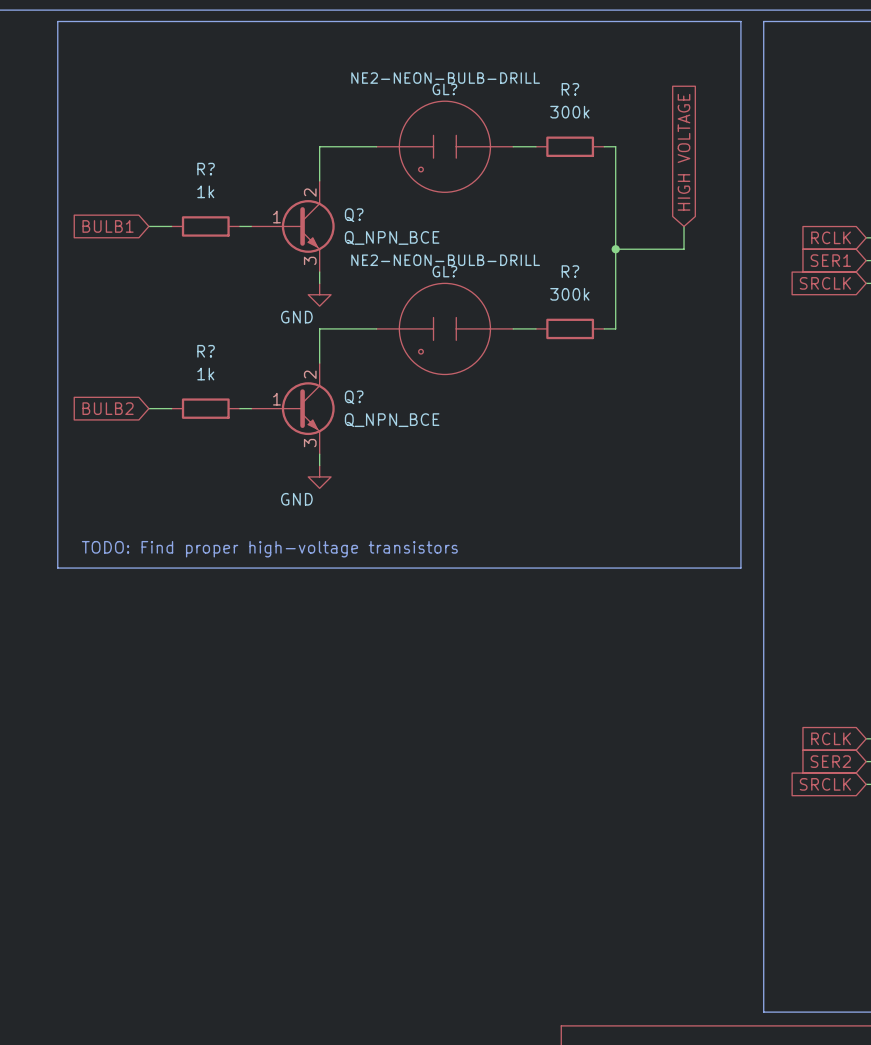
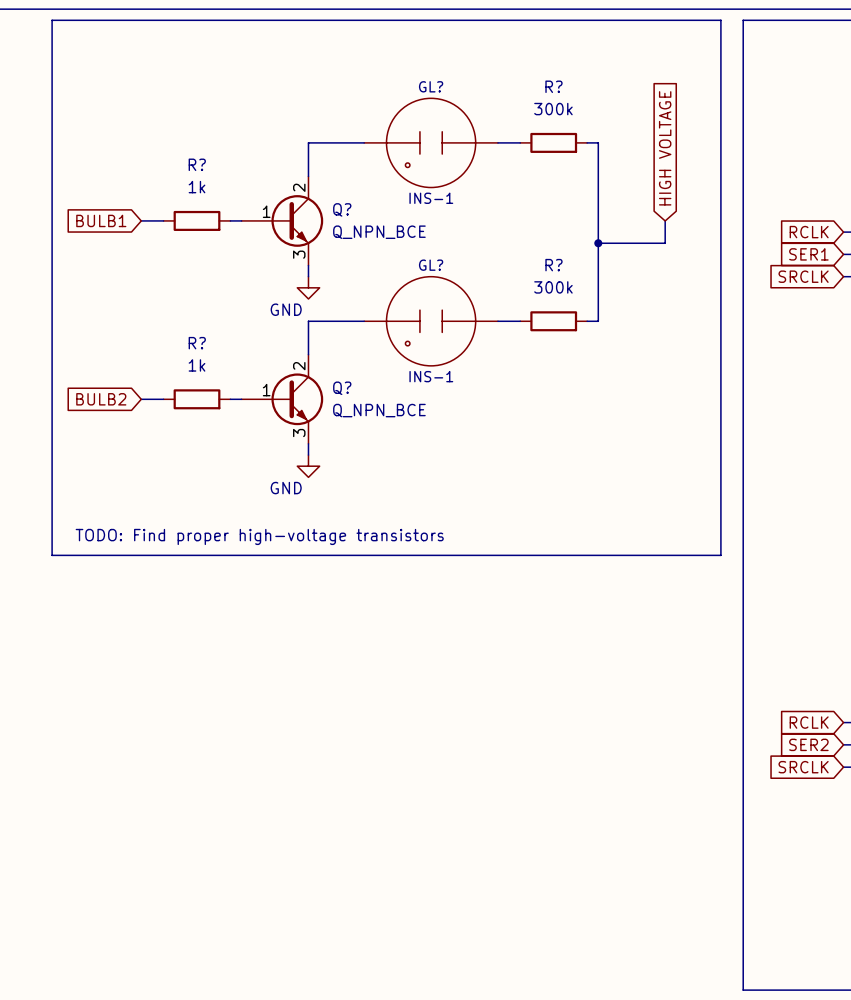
GL? value: NE2-NEON-BULB-DRILL (445, 78) -> INS-1 (431, 198)
GL? value: NE2-NEON-BULB-DRILL (445, 260) -> INS-1 (431, 376)

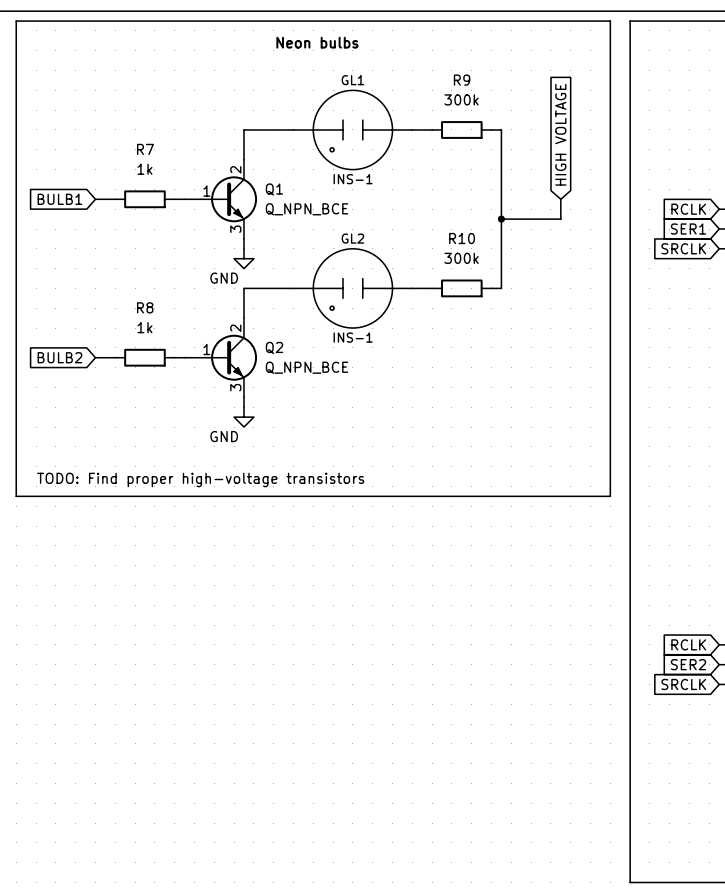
text: none -> Neon bulbs (317, 42)
GL? name: GL? (431, 86) -> GL1 (352, 80)
R? name: R? (553, 86) -> R9 (462, 80)
R? name: R? (197, 164) -> R7 (145, 149)
Q? name: Q? (342, 209) -> Q1 (274, 189)
GL? name: GL? (431, 265) -> GL2 (352, 238)
R? name: R? (553, 265) -> R10 (462, 238)
R? name: R? (197, 343) -> R8 (145, 307)
Q? name: Q? (342, 388) -> Q2 (274, 347)

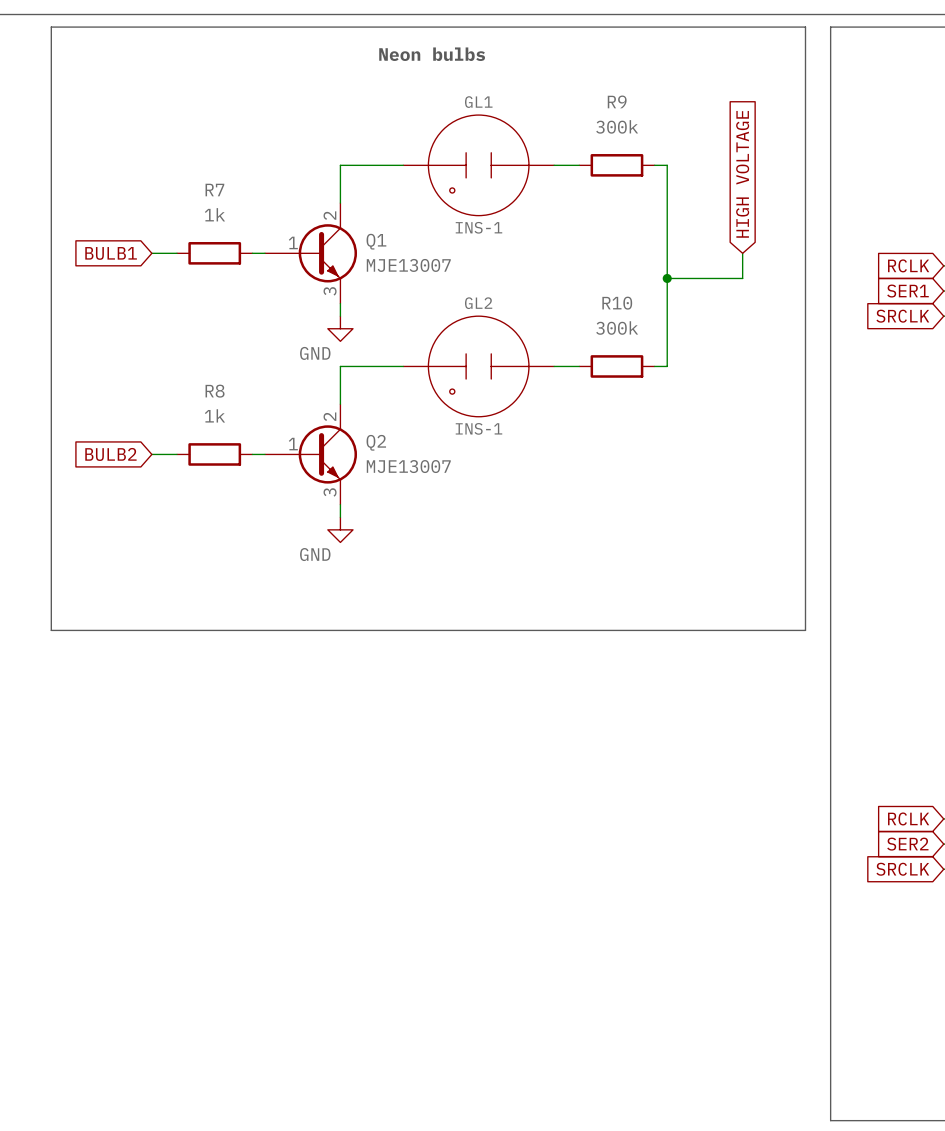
Q1 value: Q_NPN_BCE (307, 209) -> MJE13007 (408, 265)
Q2 value: Q_NPN_BCE (307, 367) -> MJE13007 (408, 466)
text: TODO: Find proper high-voltage transistors (200, 479) -> none

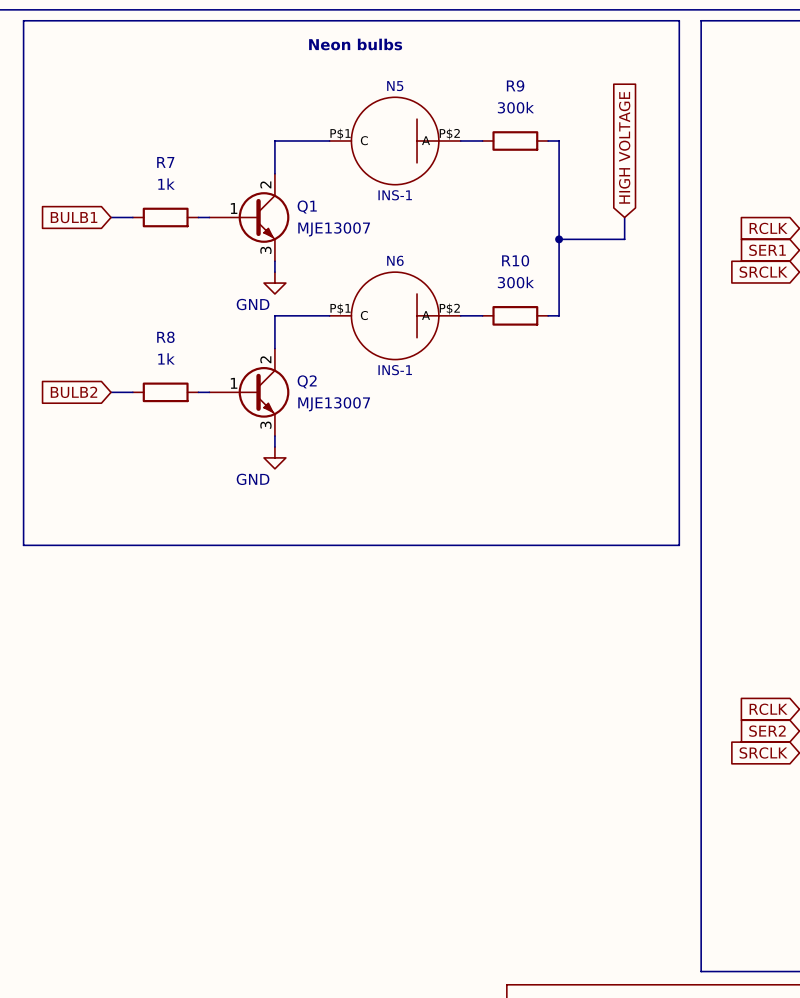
GL1: INS-1 (478, 165) -> none
N5: none -> INS-1 (395, 140)
GL2: INS-1 (478, 366) -> none
N6: none -> INS-1 (395, 315)

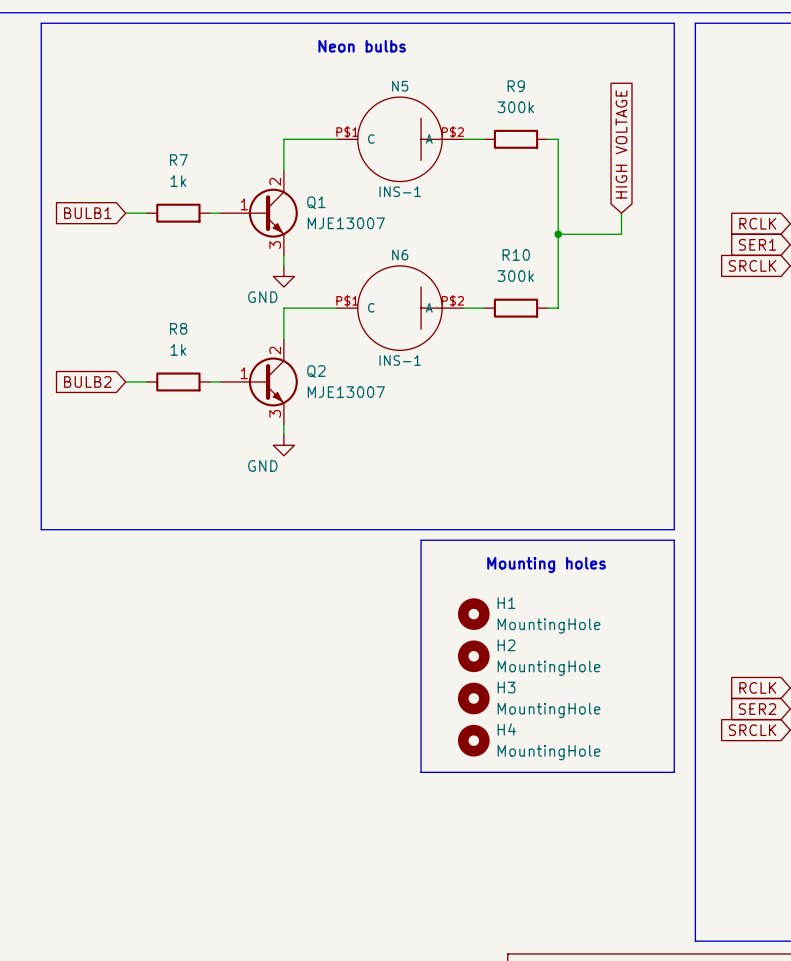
line: none -> (421, 540) (421, 772) (674, 772) (674, 540) (421, 540)
text: none -> Mounting holes (546, 565)
H1: none -> MountingHole (473, 614)
H2: none -> MountingHole (473, 656)
H3: none -> MountingHole (473, 698)
H4: none -> MountingHole (473, 740)

